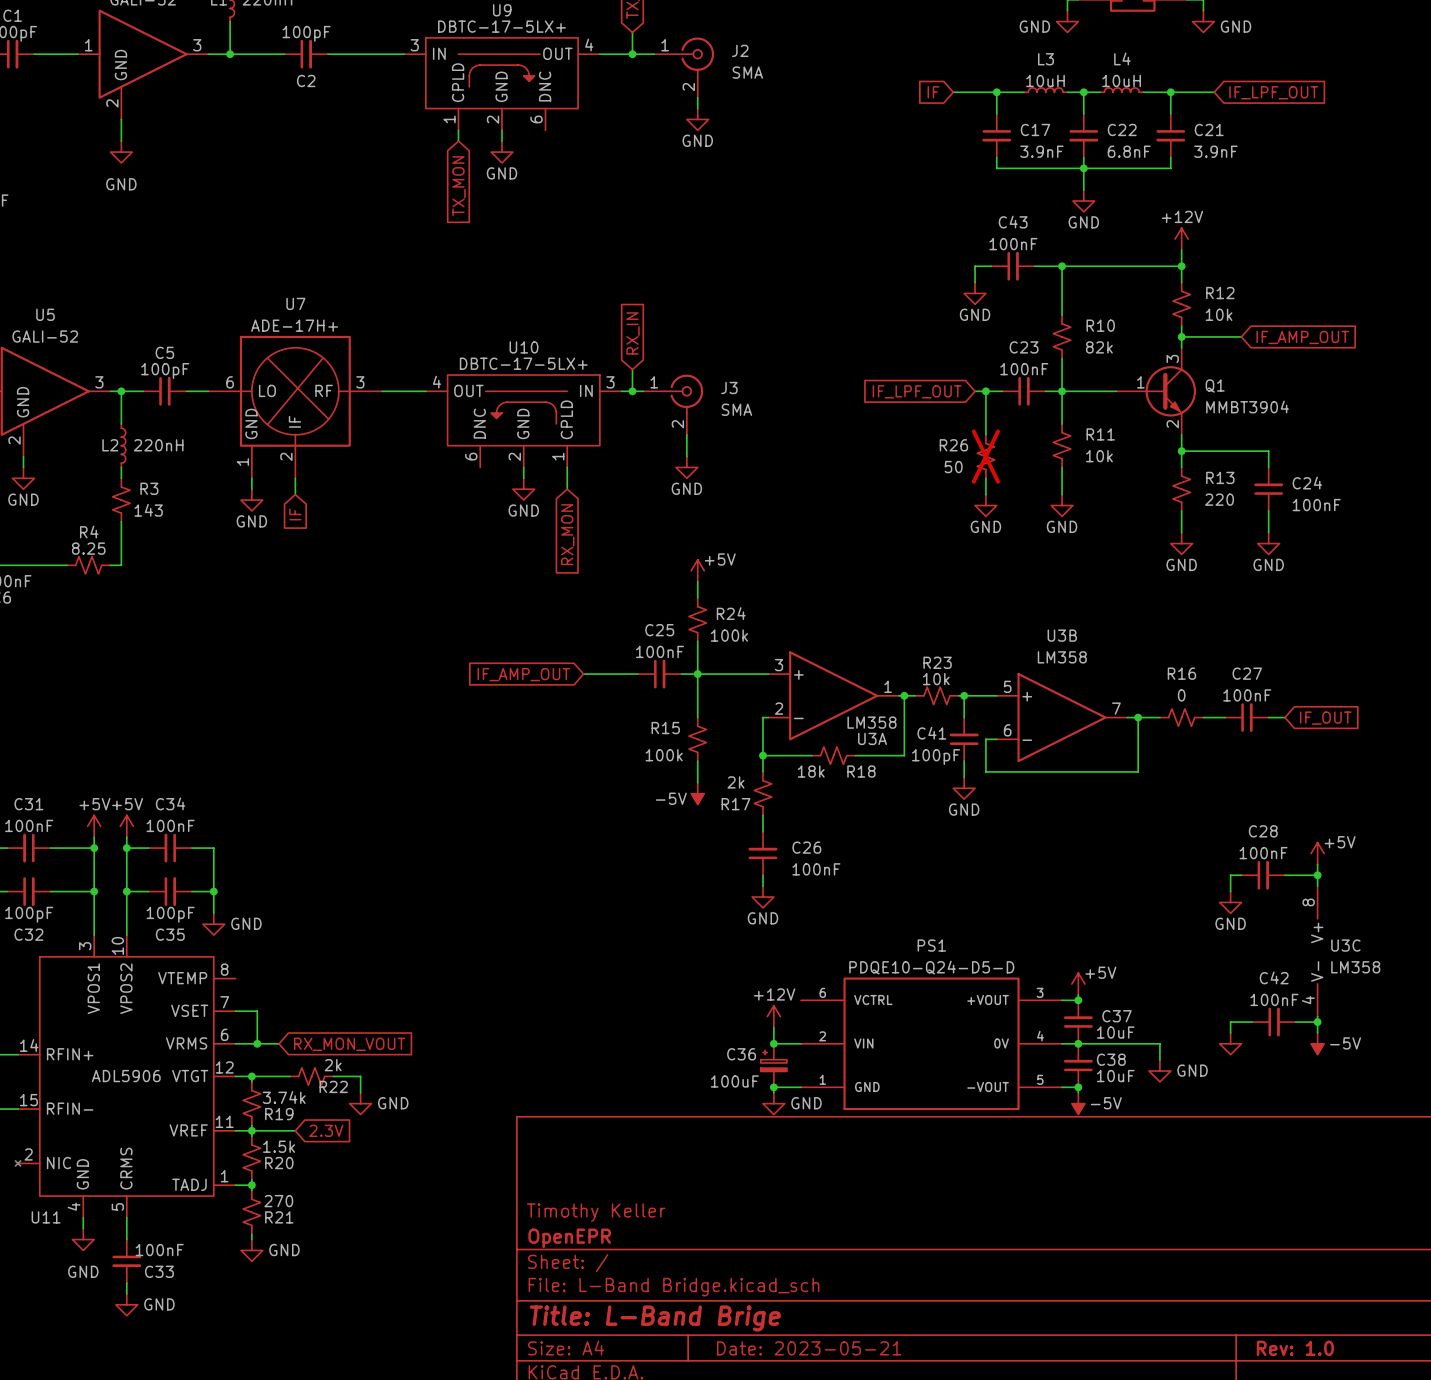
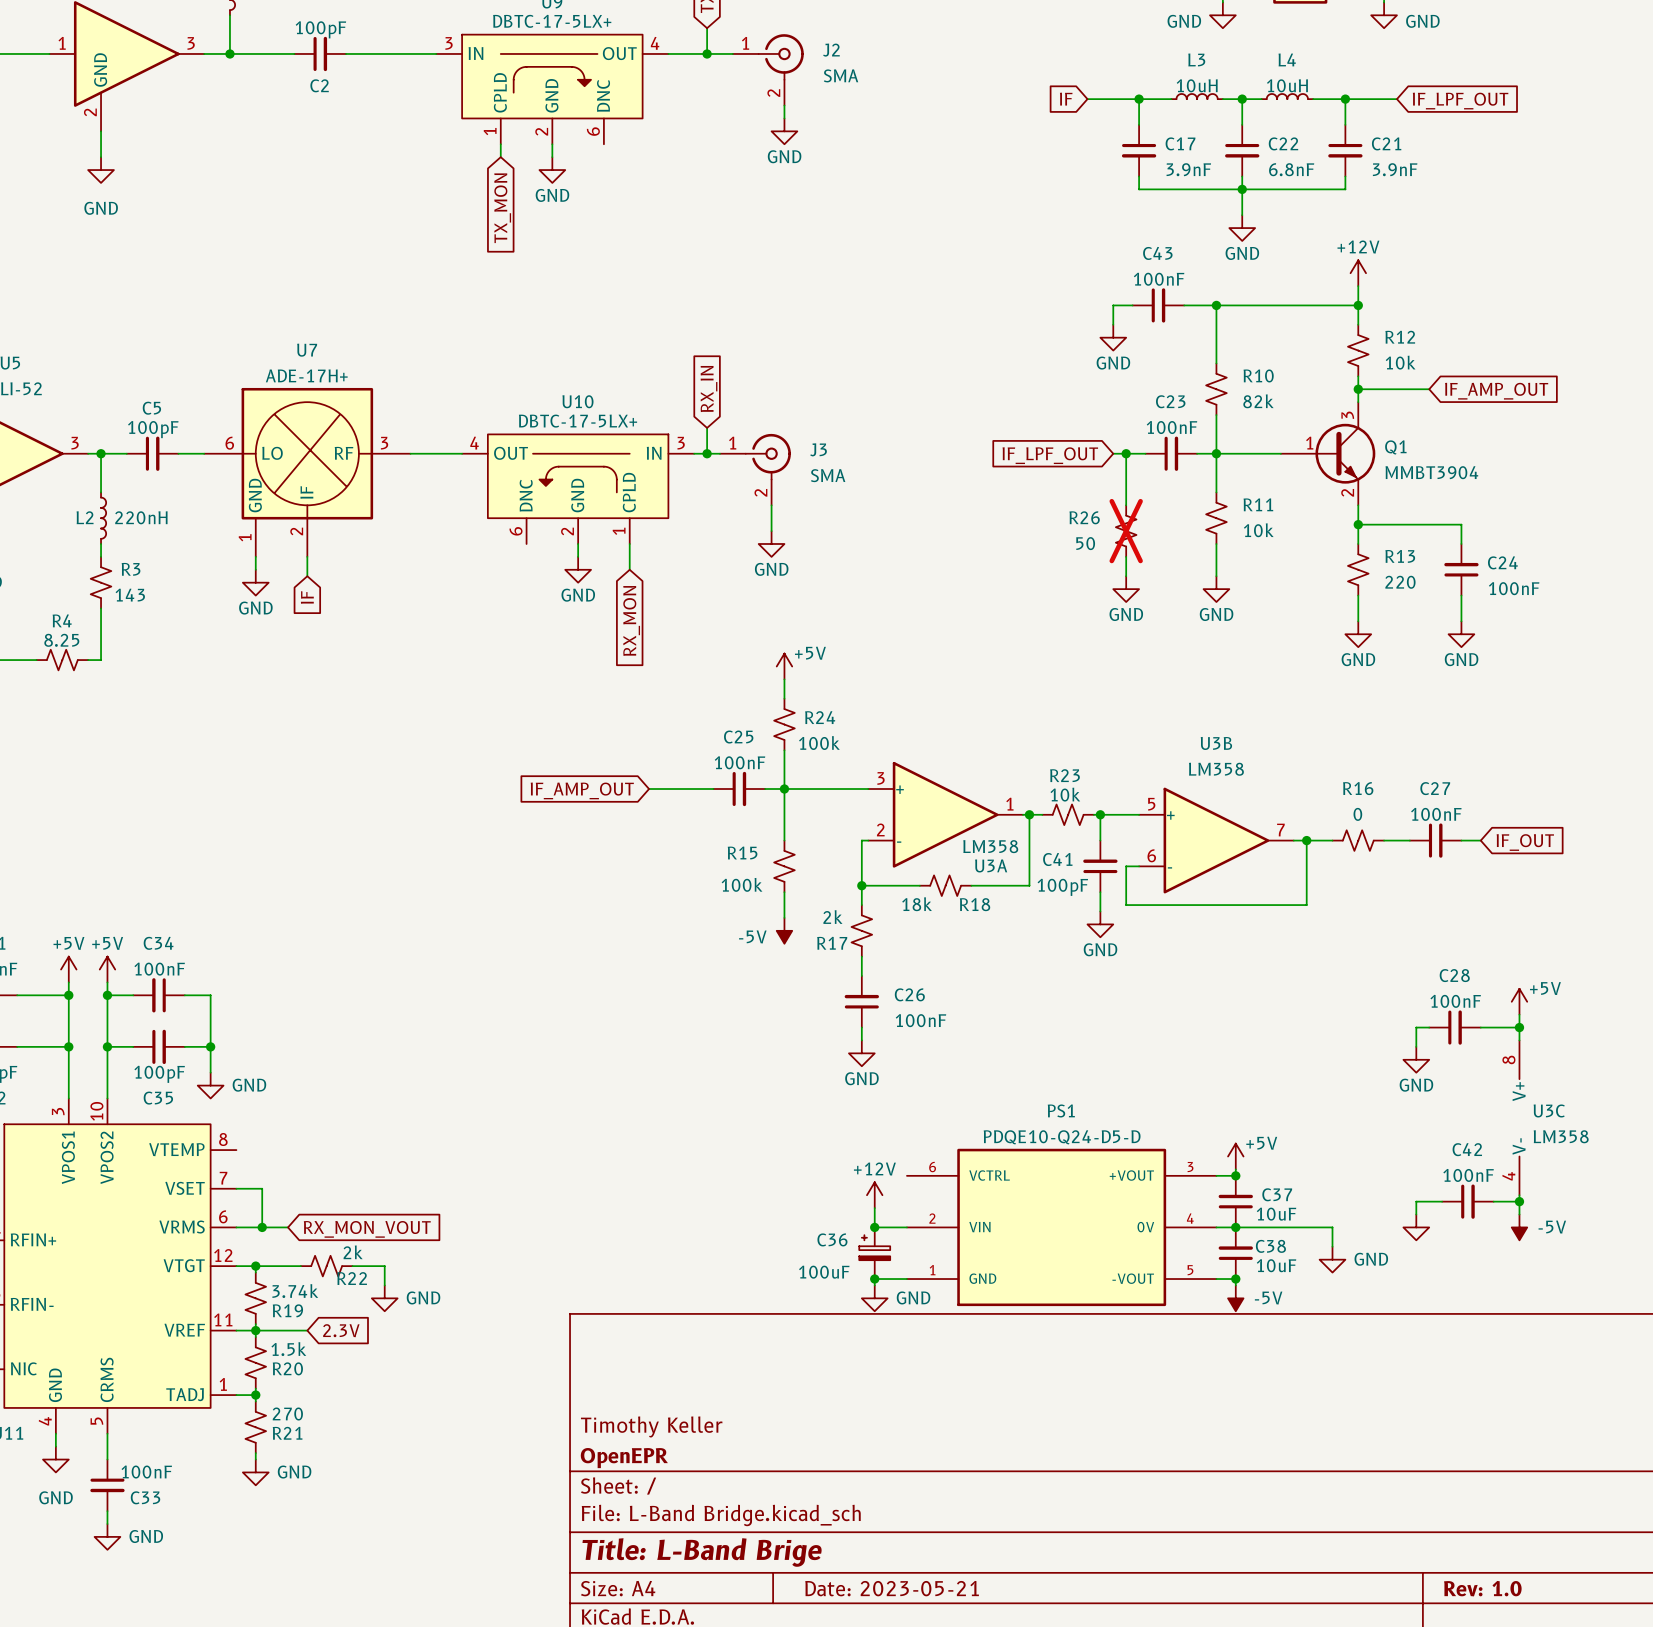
U11 value: ADL5906 (126, 1076) -> none

